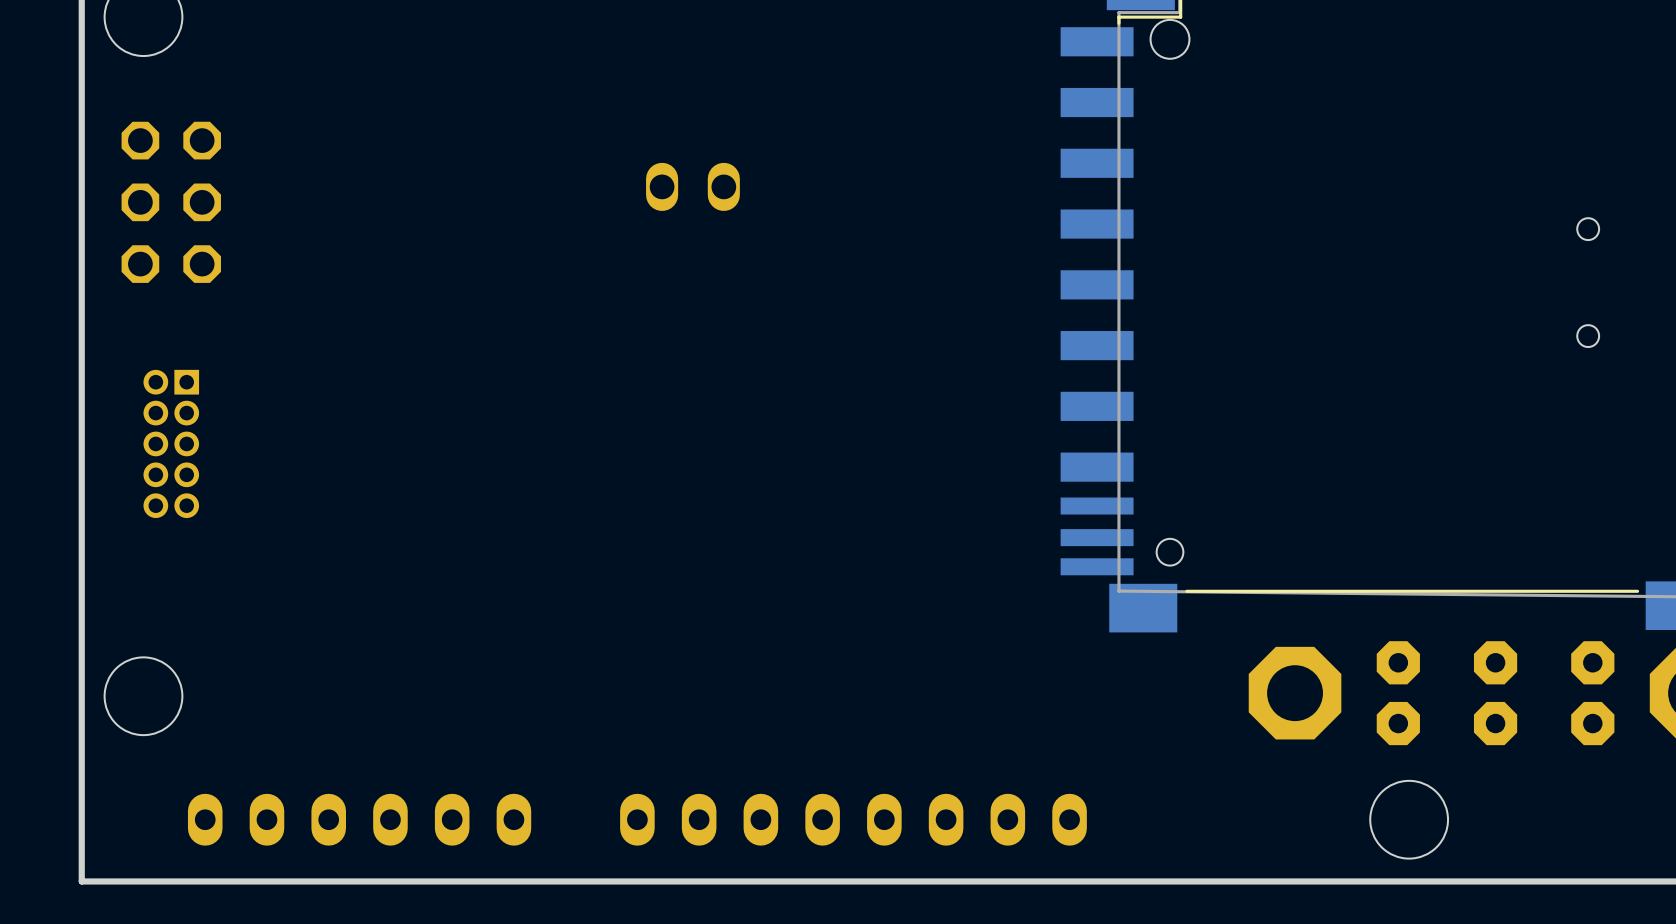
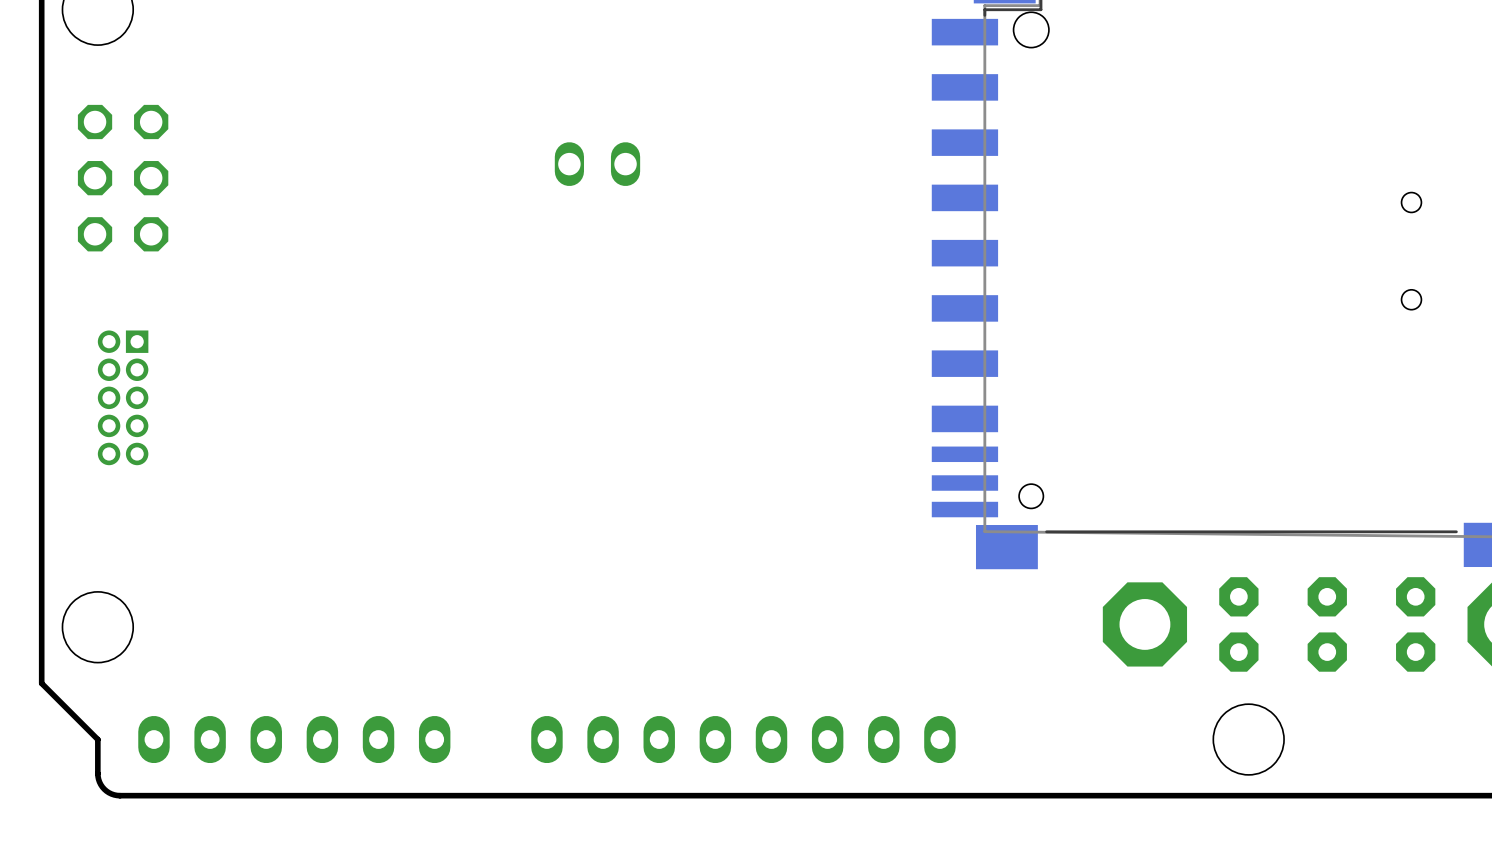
board edge: (81, 757) (81, 881) (167, 881) -> (41, 683) (97, 739) (99, 782) (106, 791) (119, 795)

